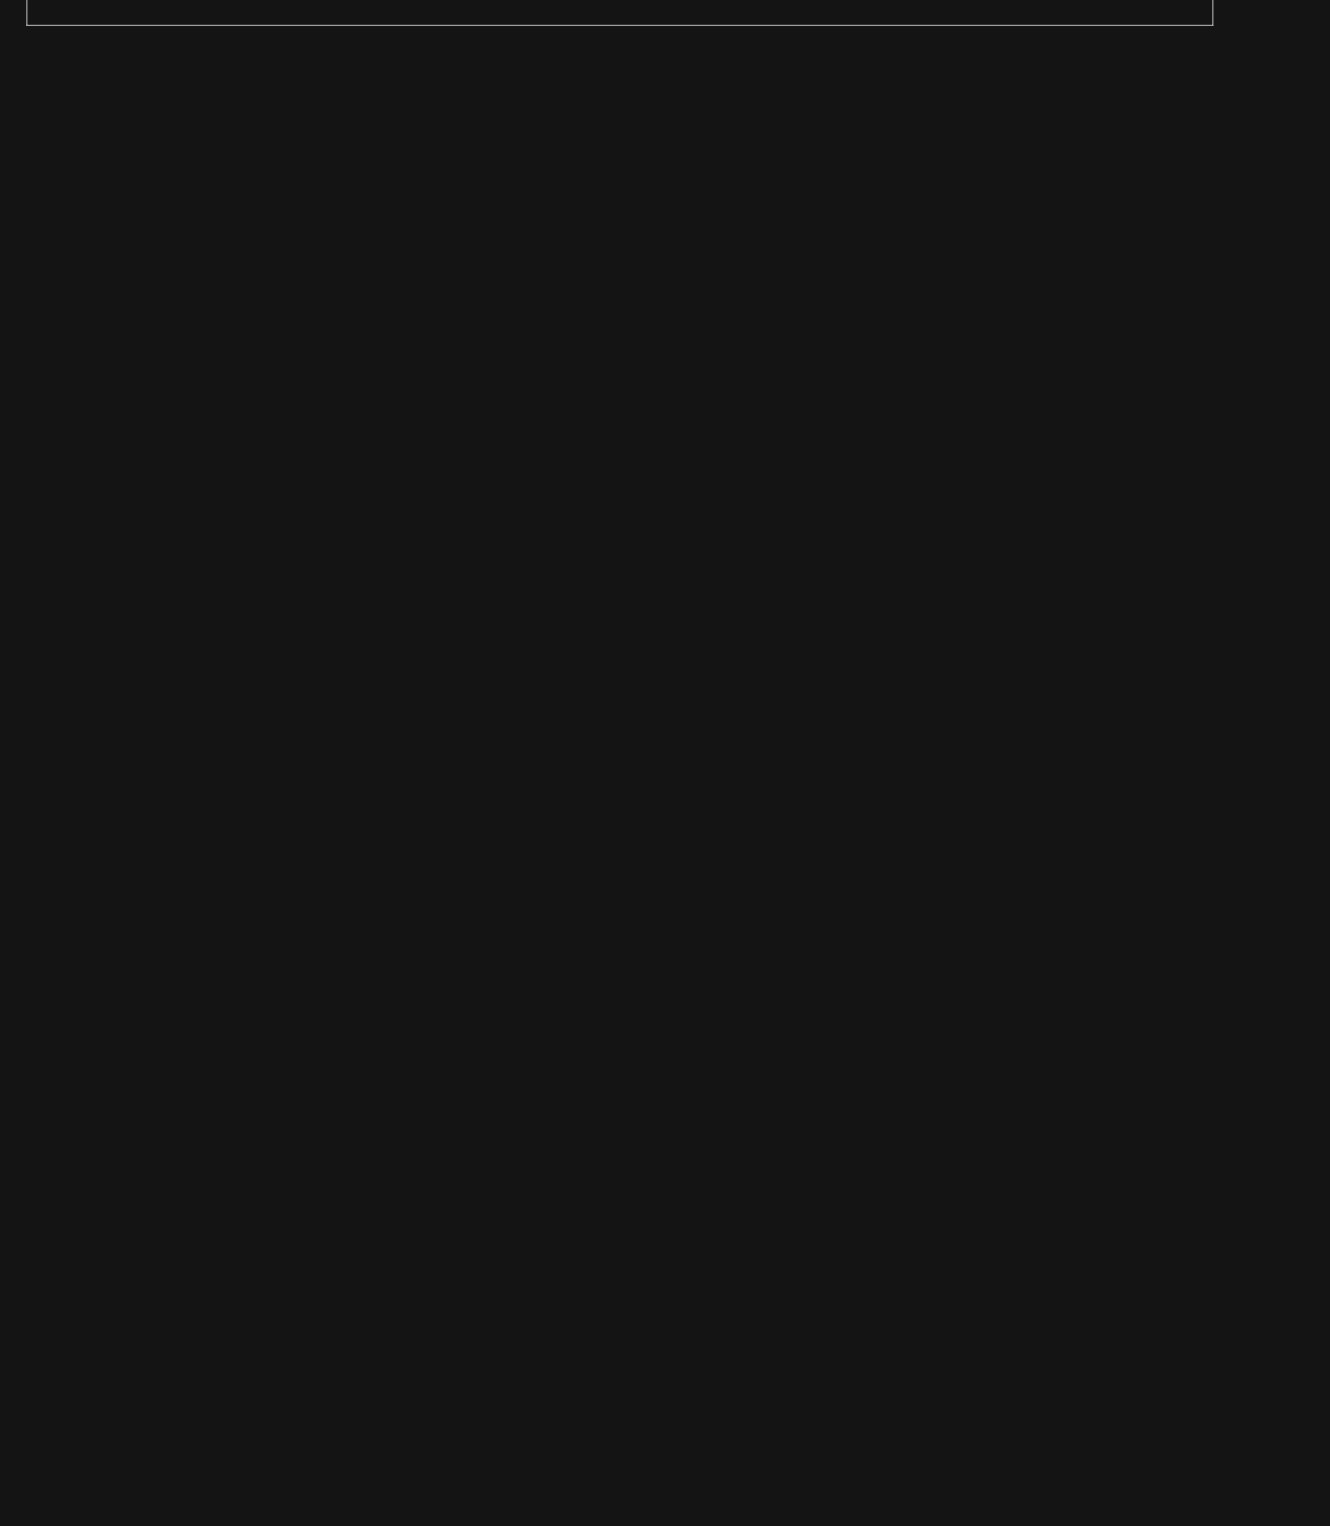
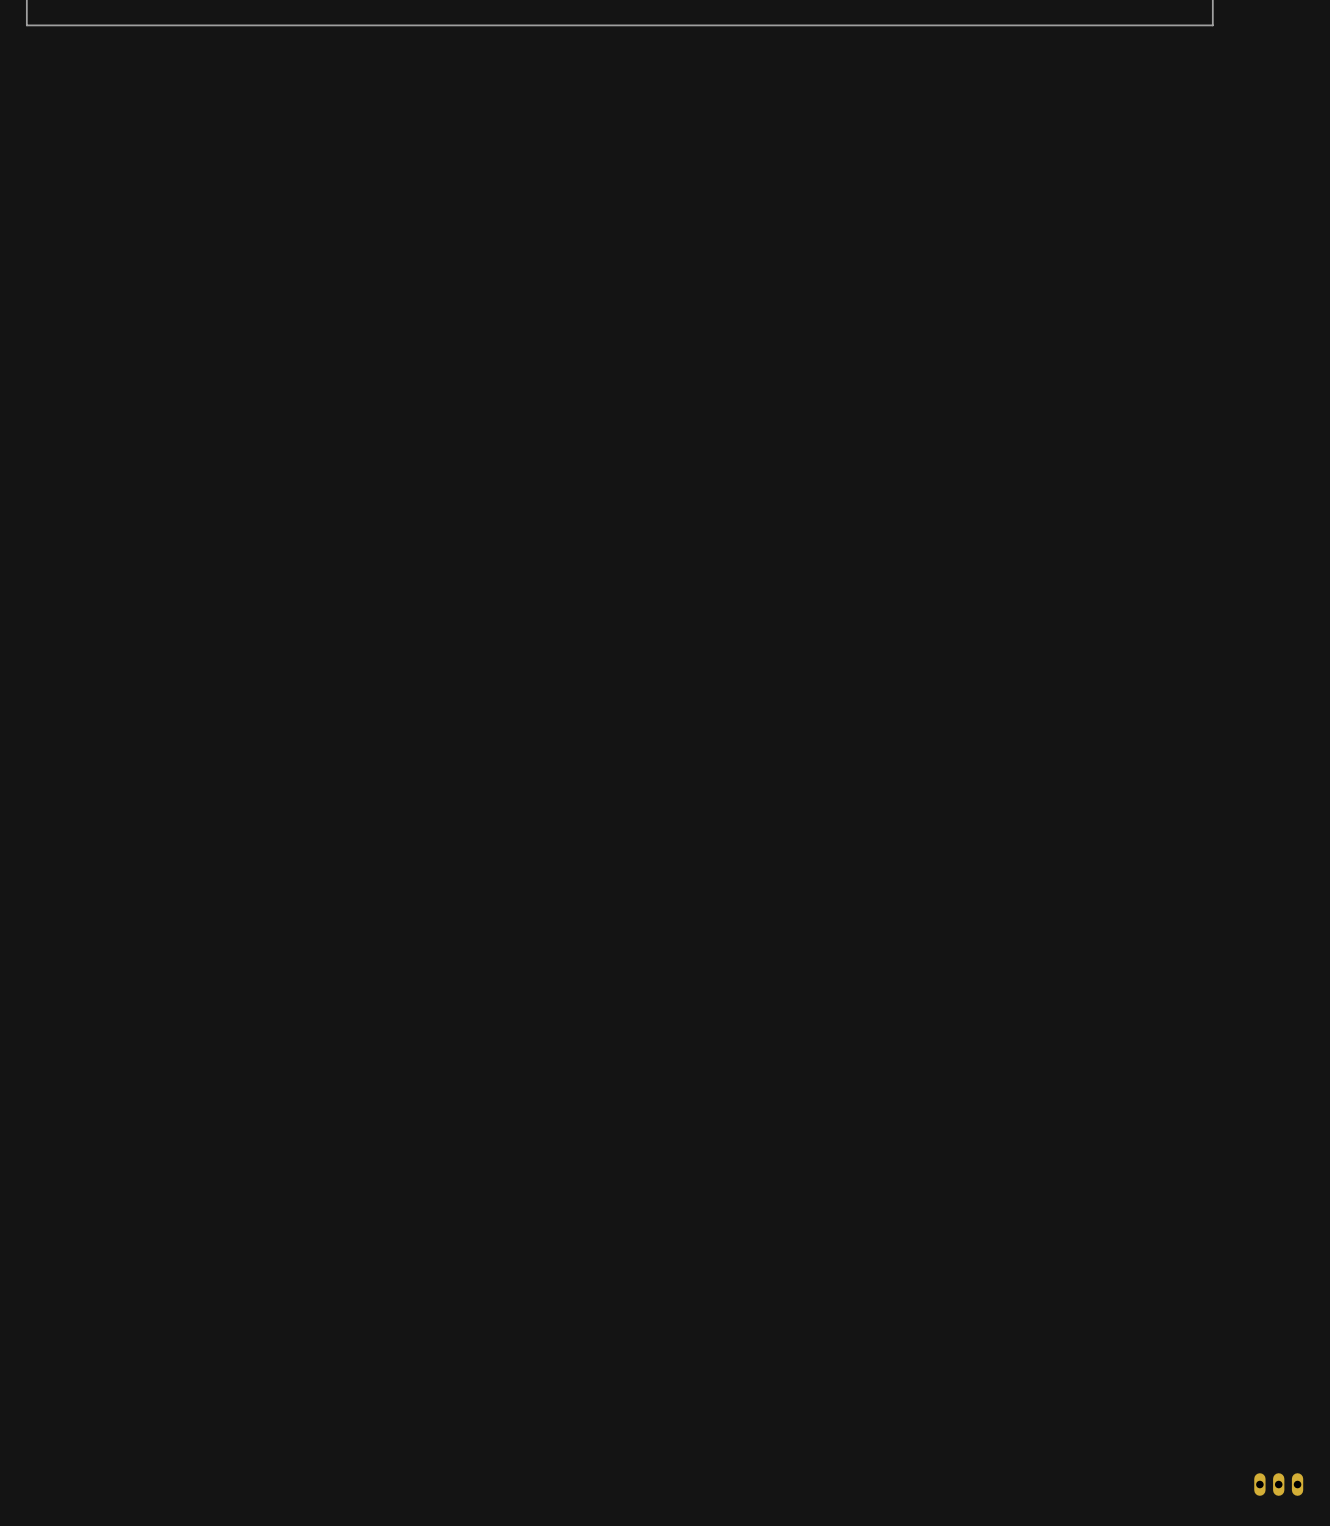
part: none -> (1278, 1484)

